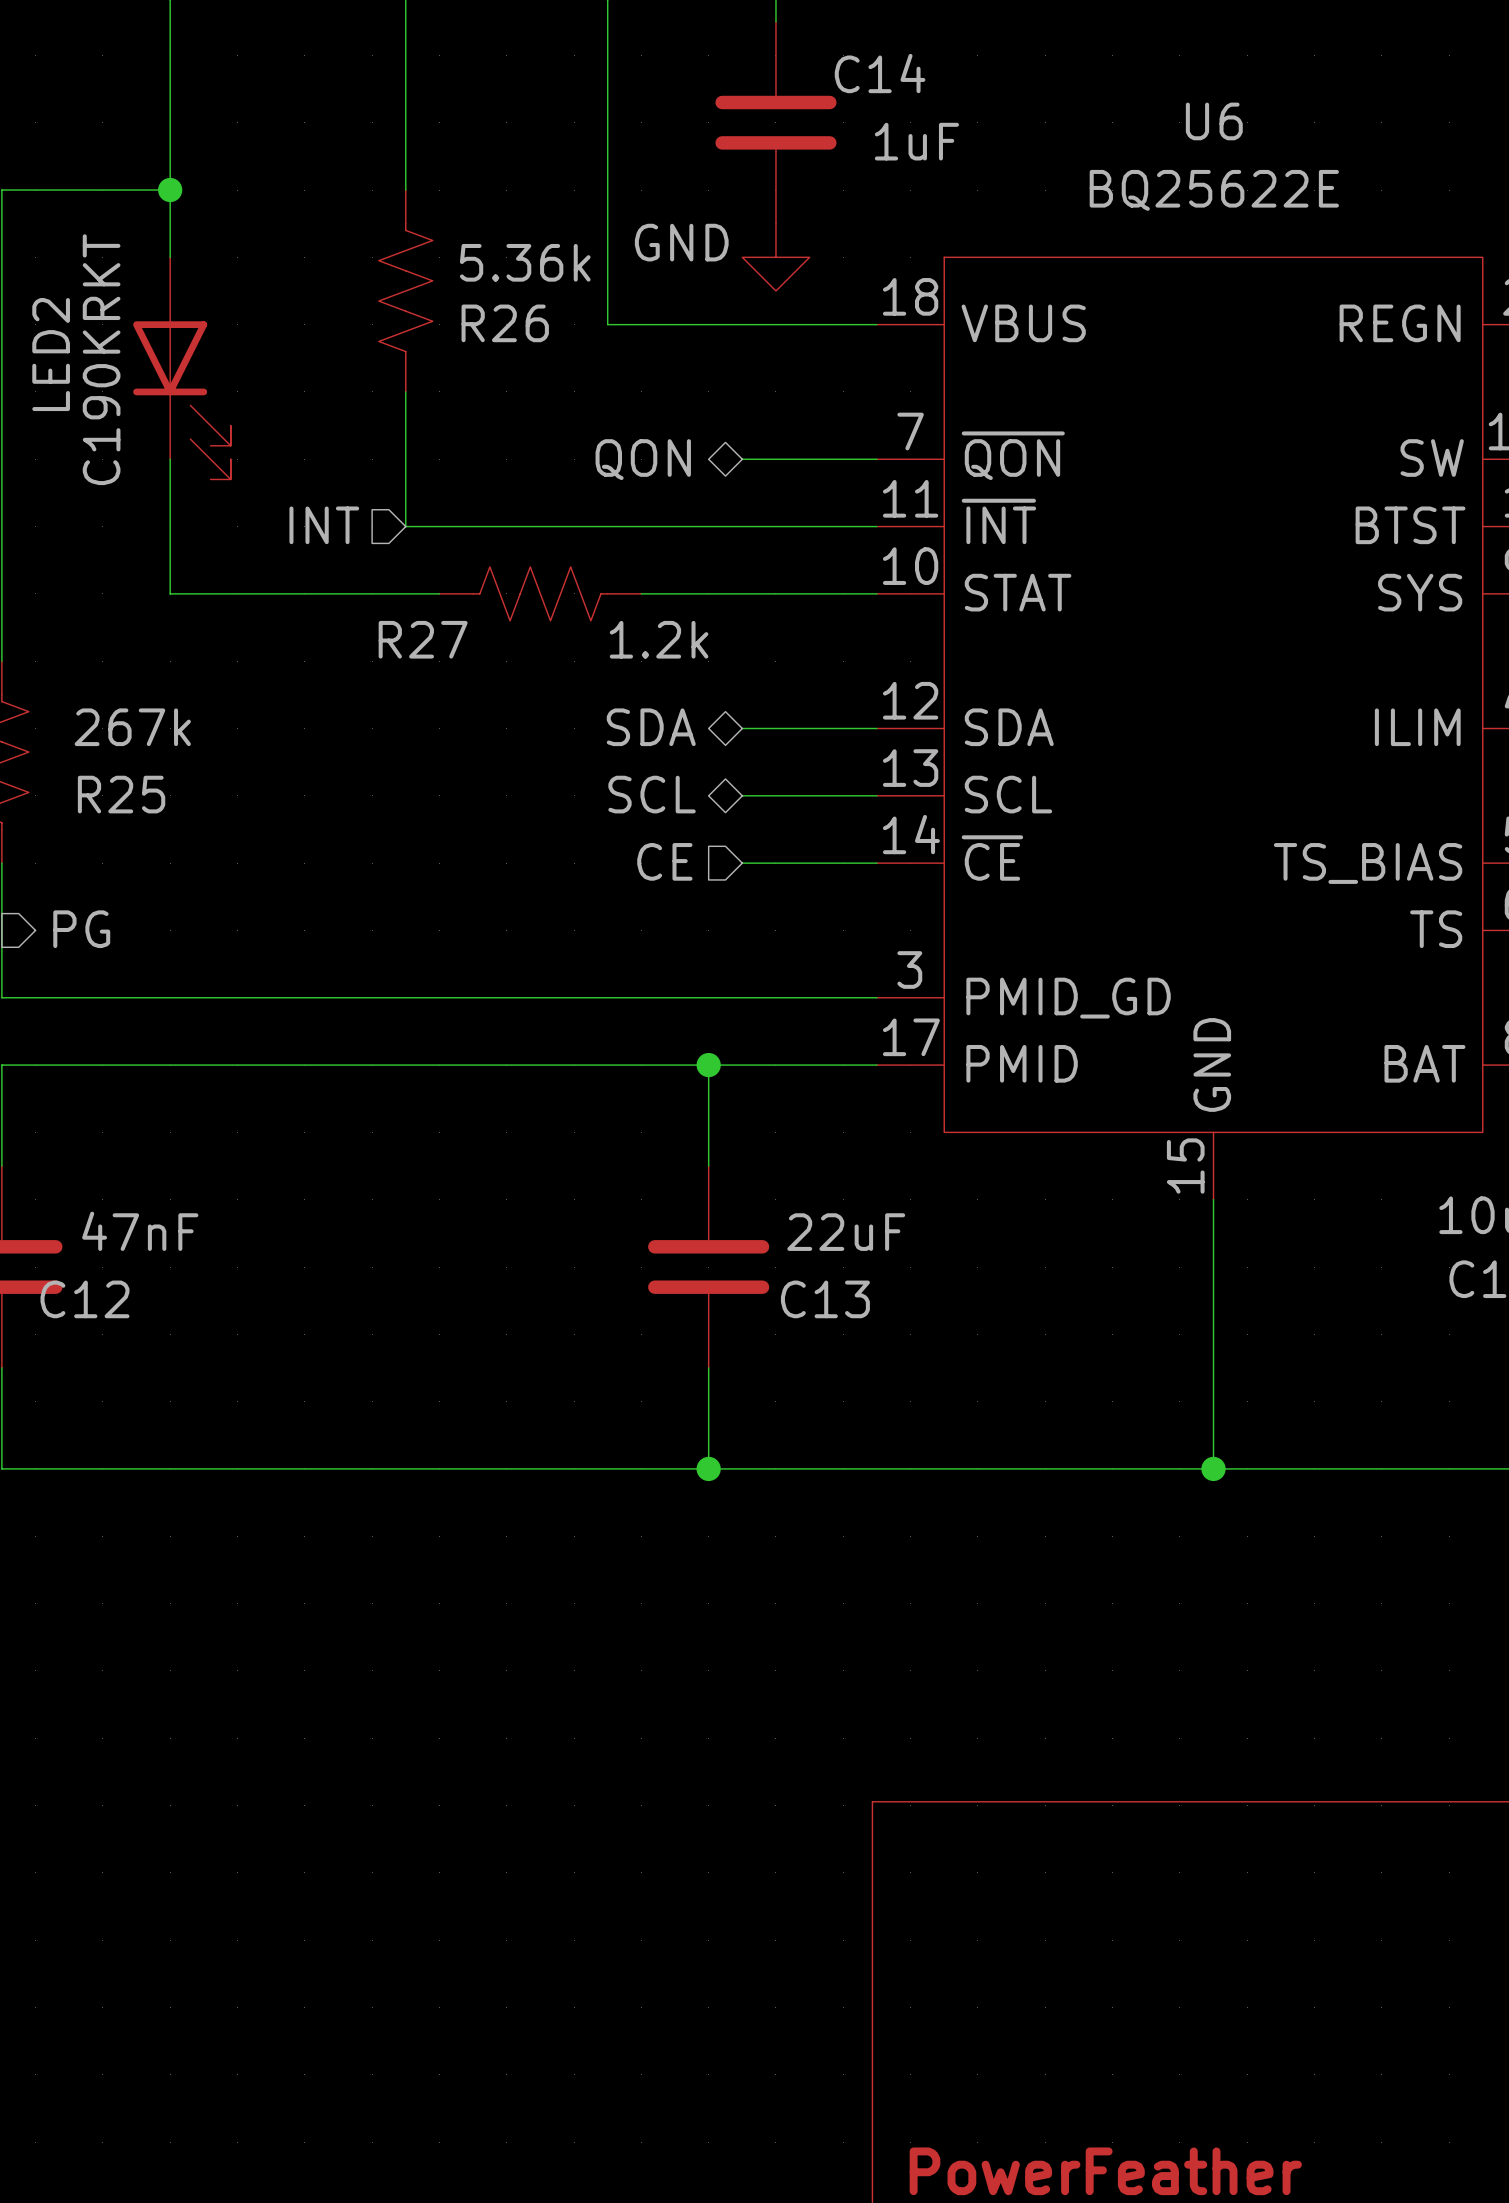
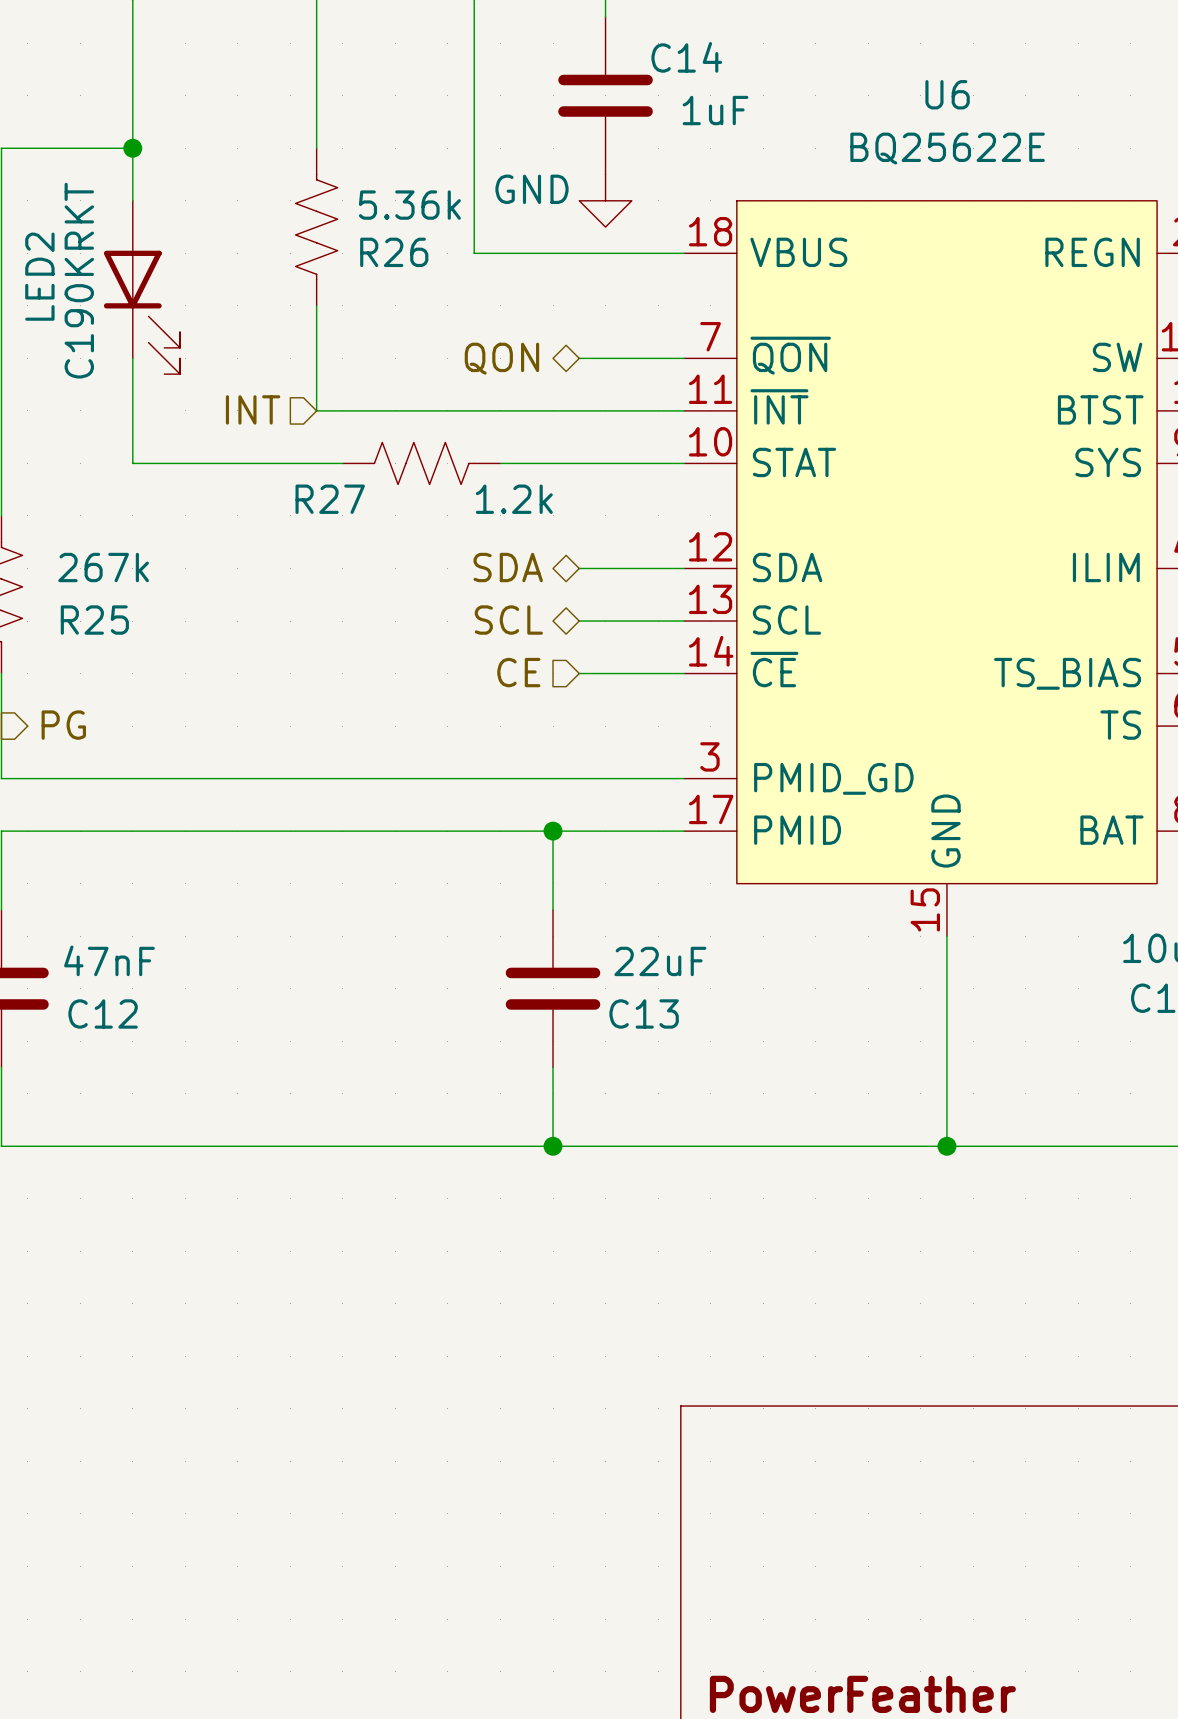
C12 name position: C12 (84, 1299) -> C12 (103, 1013)

